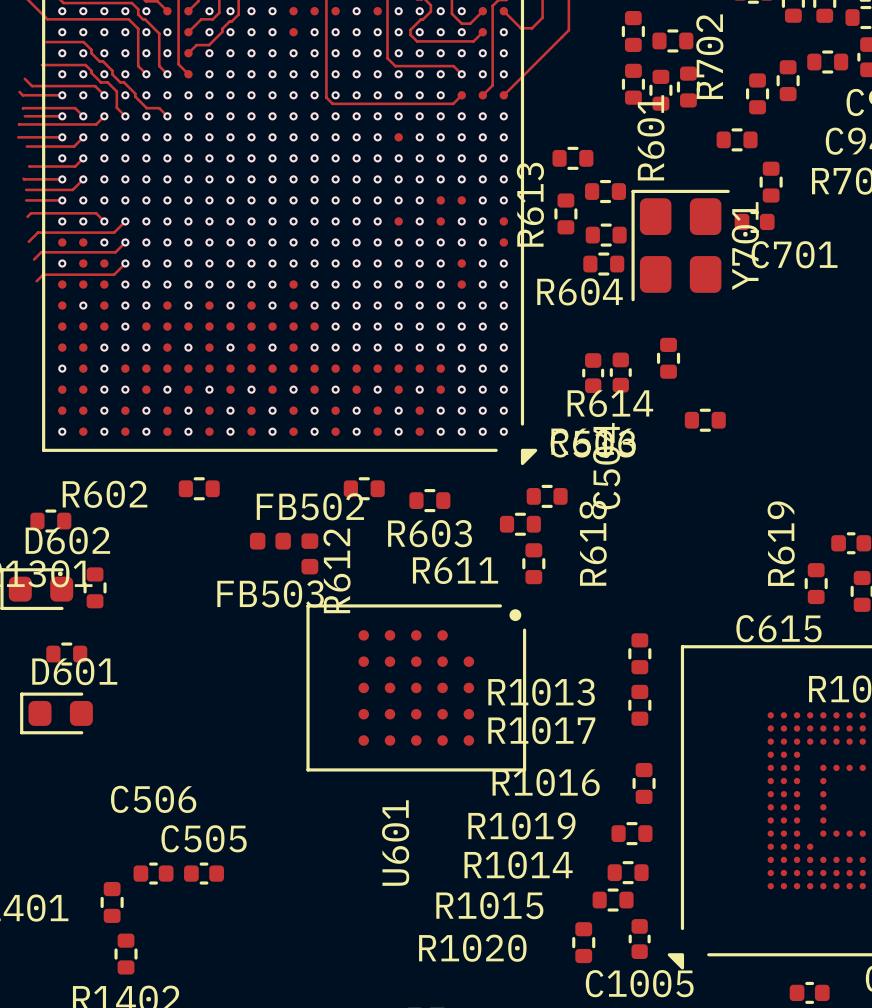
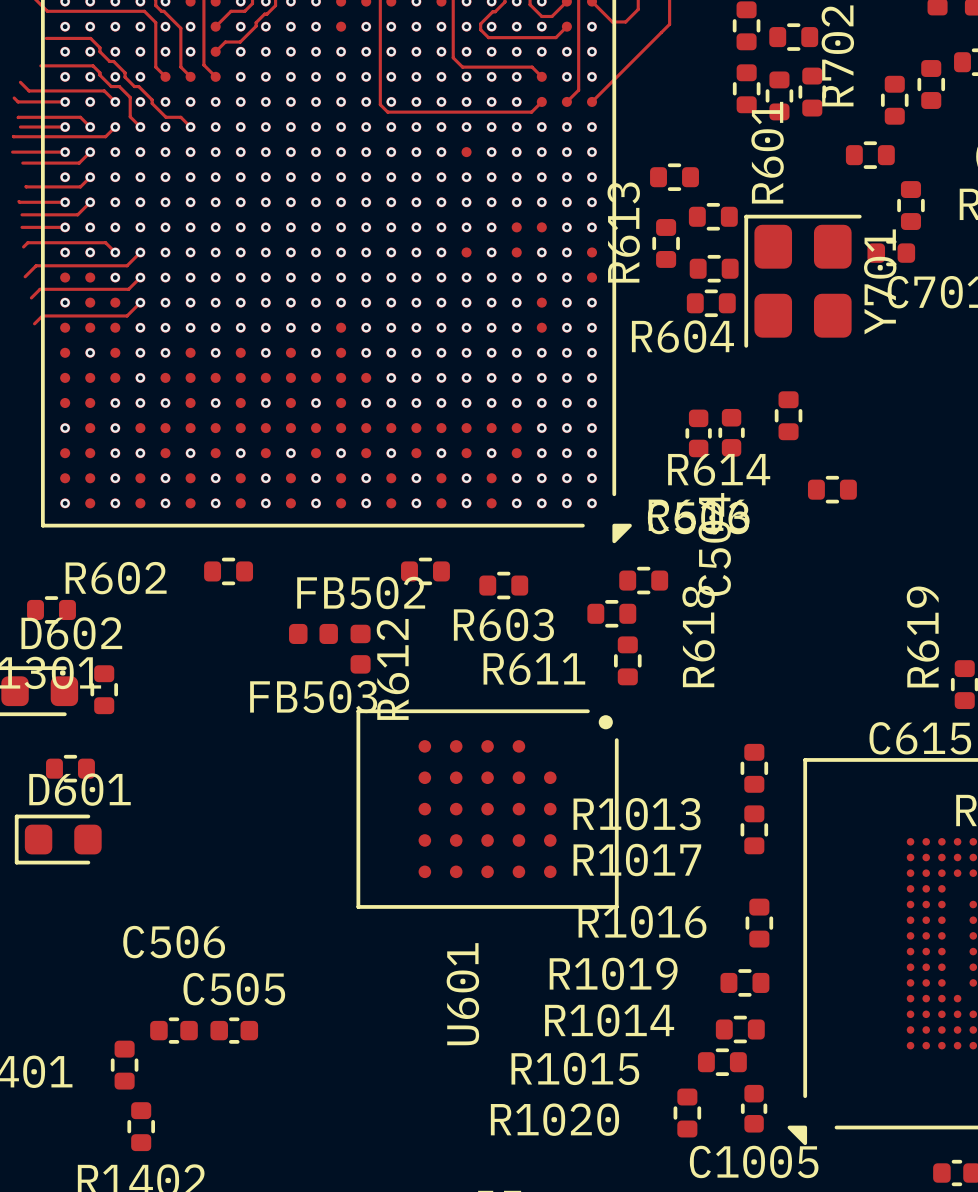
via: (146, 74) -> none
via: (167, 74) -> none
via: (461, 74) -> none

